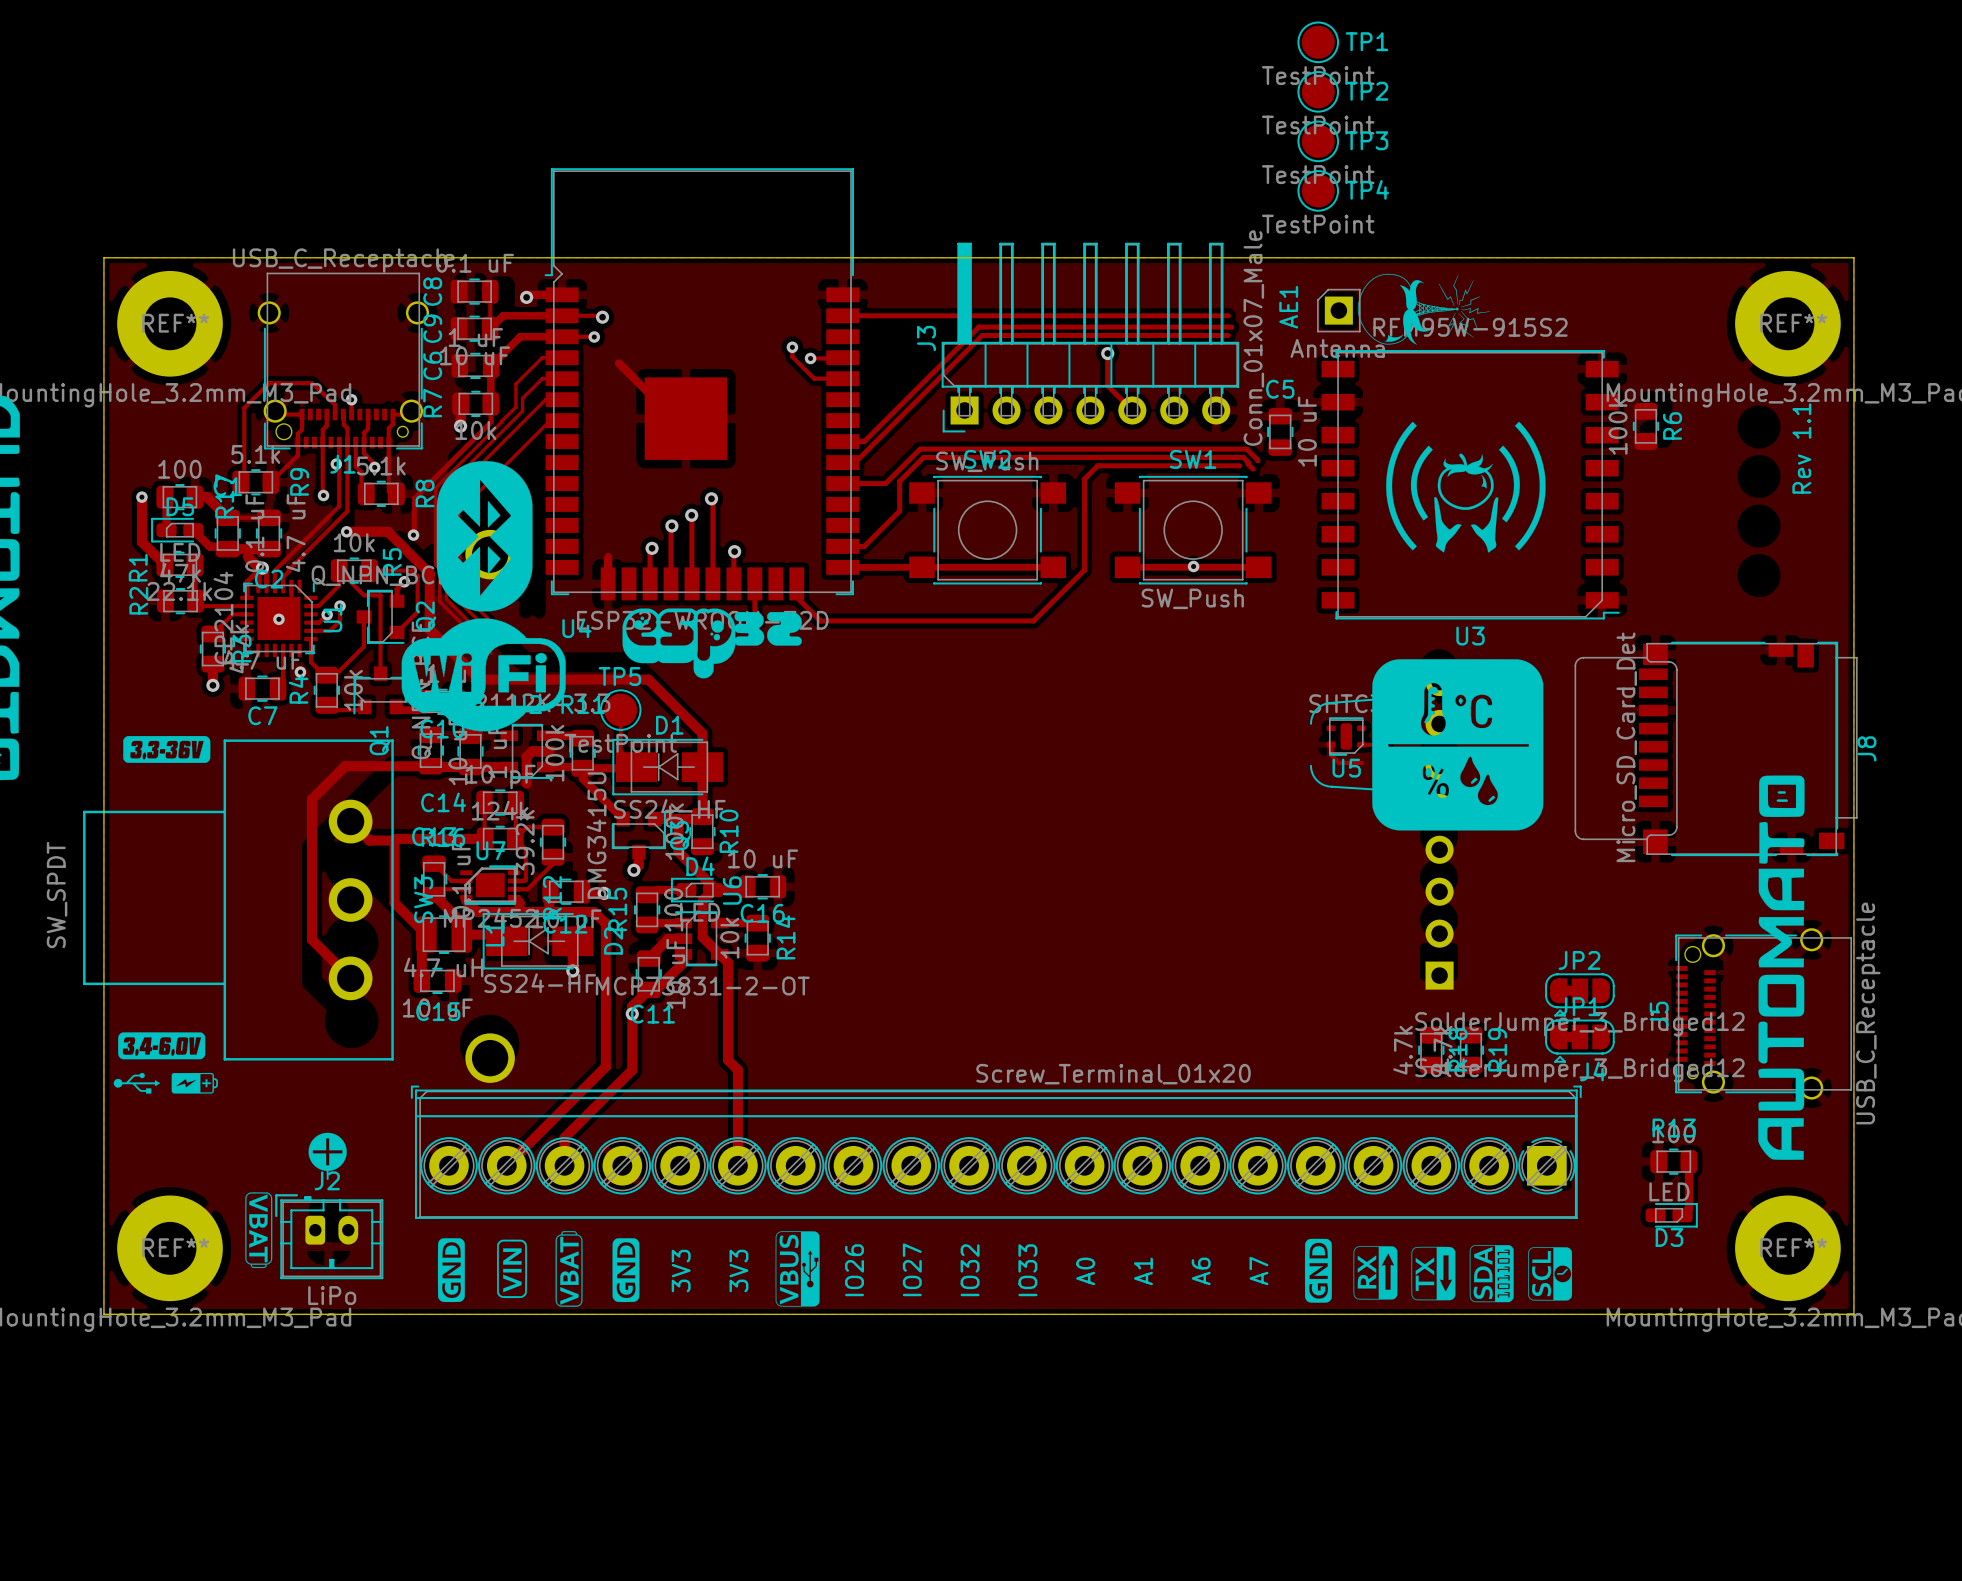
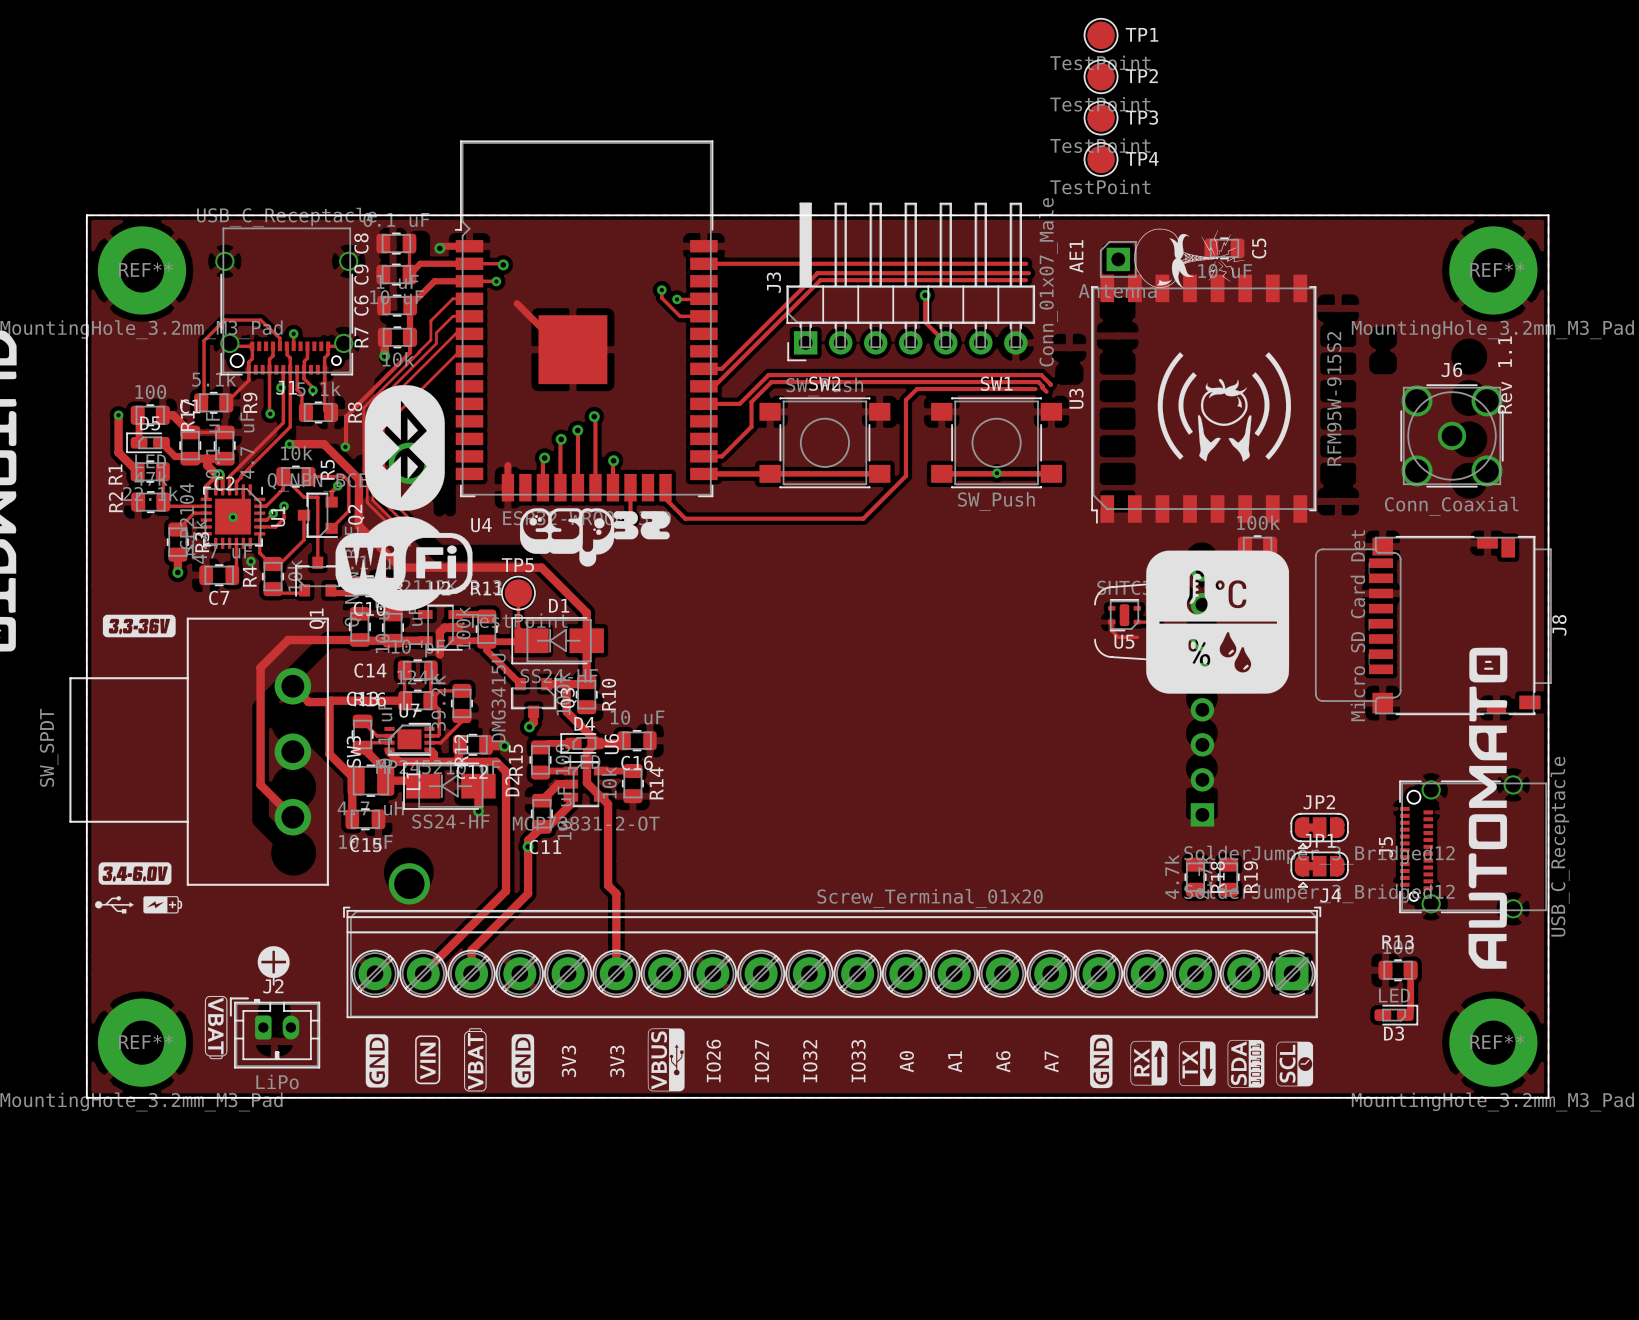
R6 rotation: 0° (1645, 426) -> 90° clockwise (1257, 546)
R6 position: (1645, 426) -> (1257, 546)
C5 rotation: 0° (1280, 431) -> 90° clockwise (1224, 248)
C5 position: (1280, 431) -> (1224, 248)
U3 rotation: 0° (1470, 484) -> 90° clockwise (1203, 399)
J6: none -> Conn_Coaxial (1452, 435)

